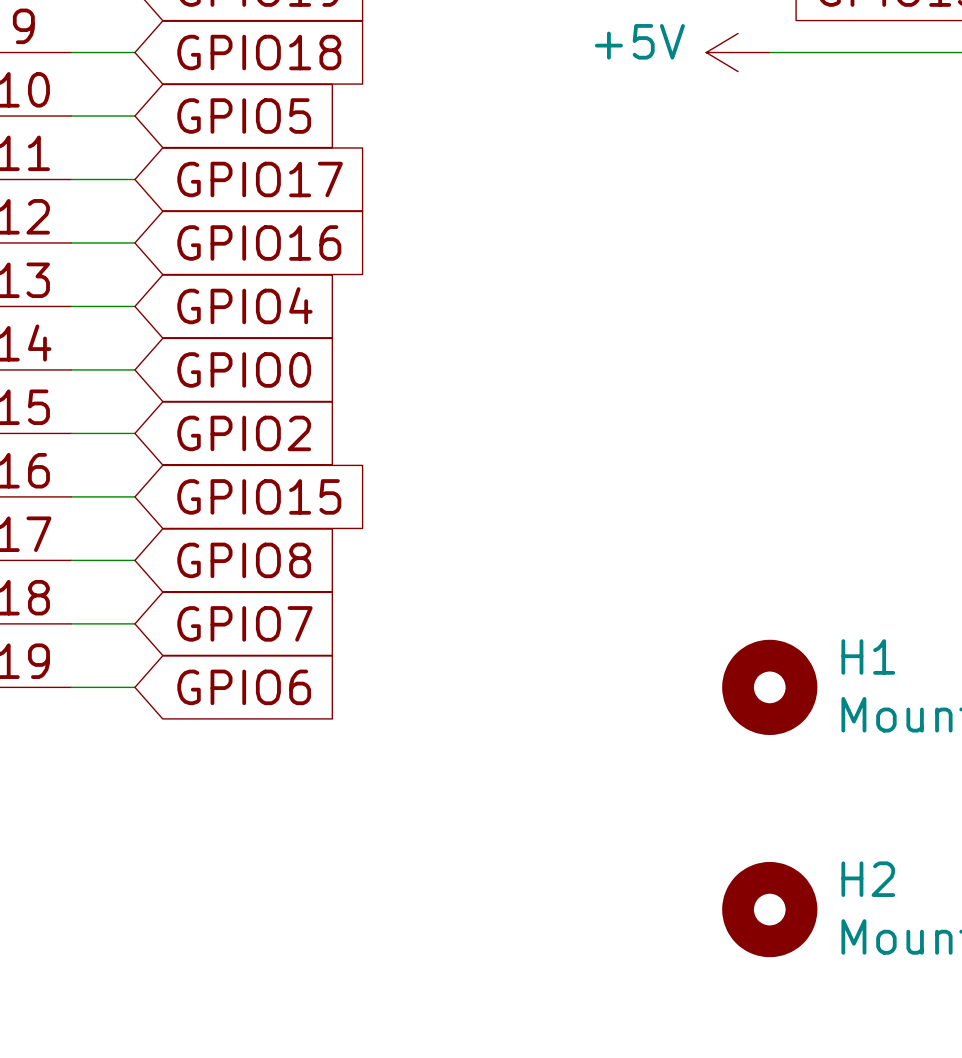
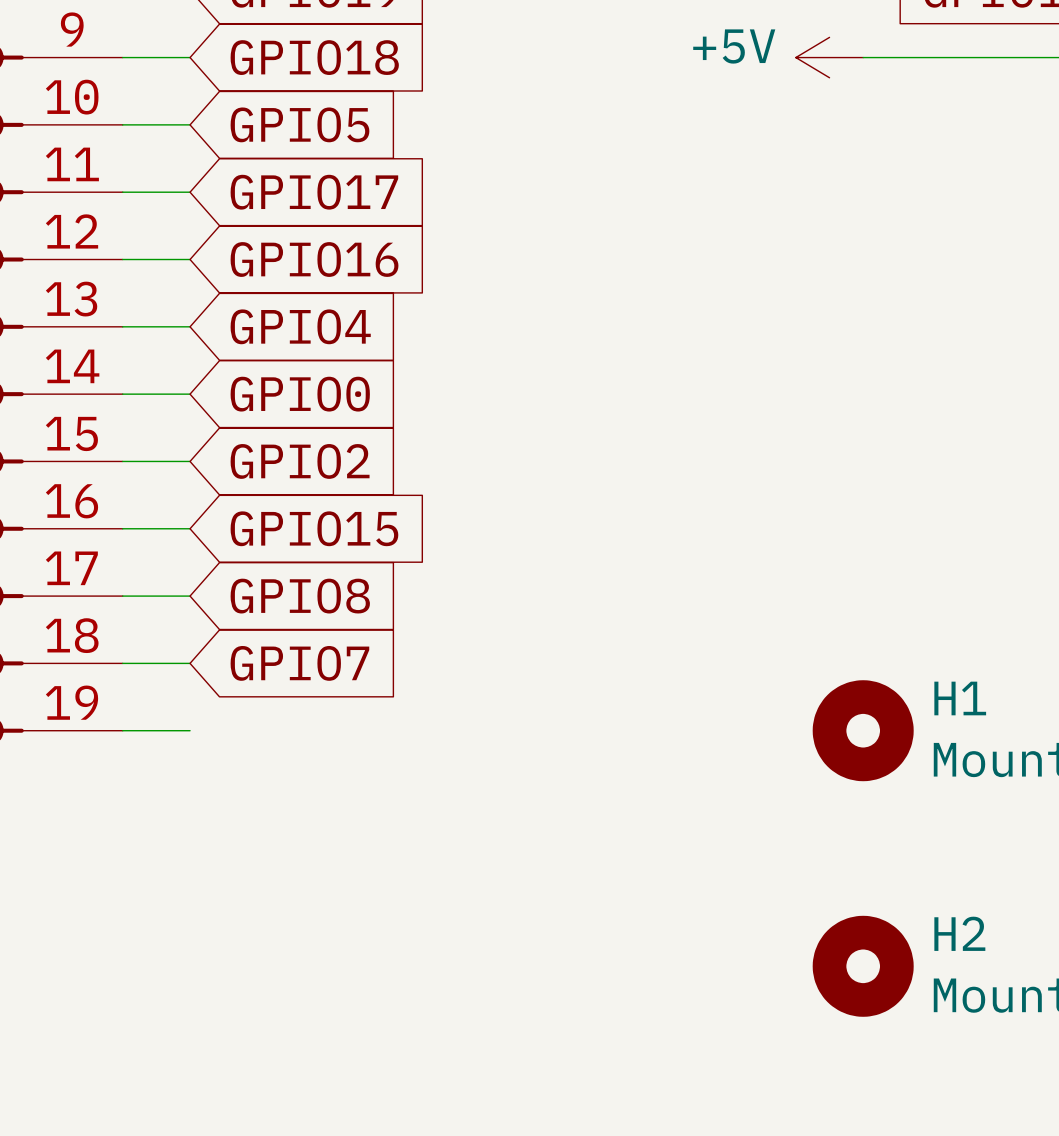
global label: GPIO6 (244, 687) -> none

